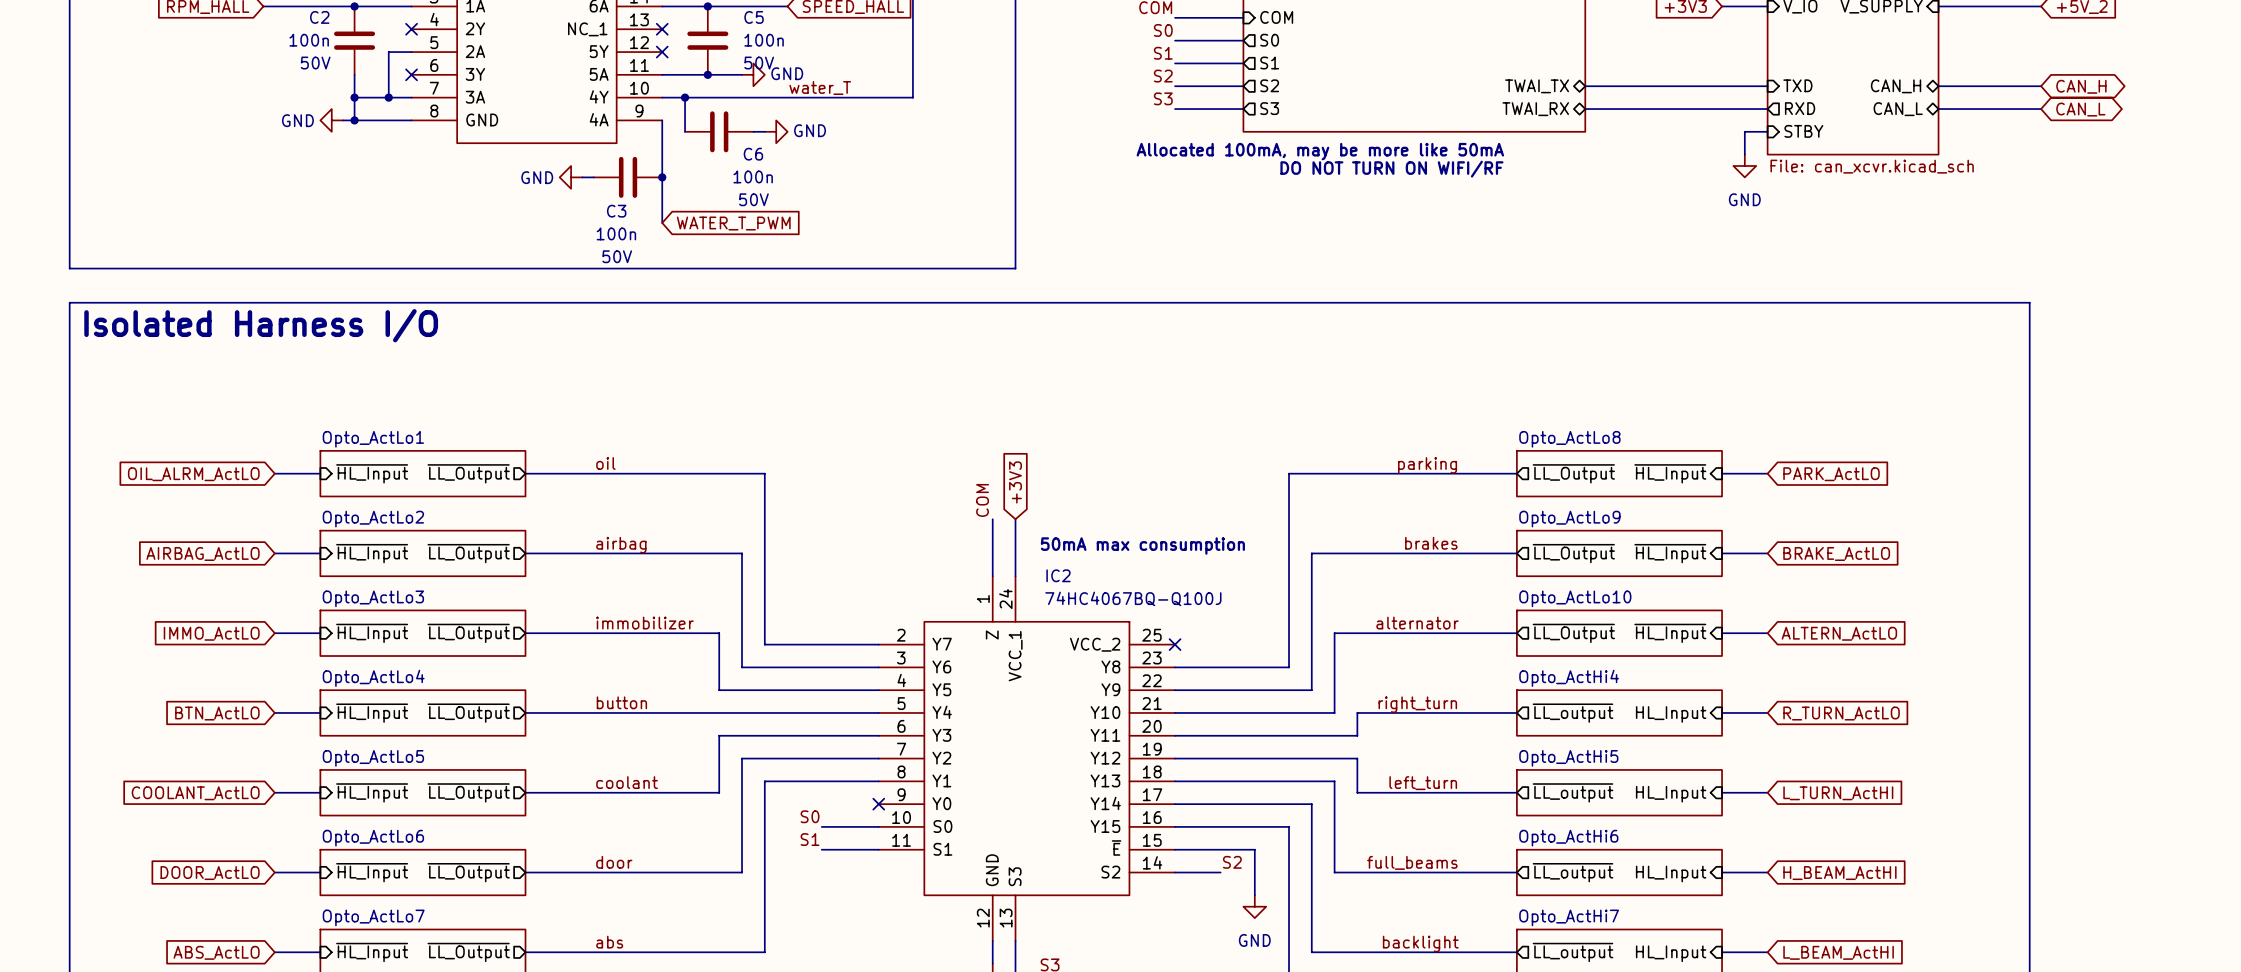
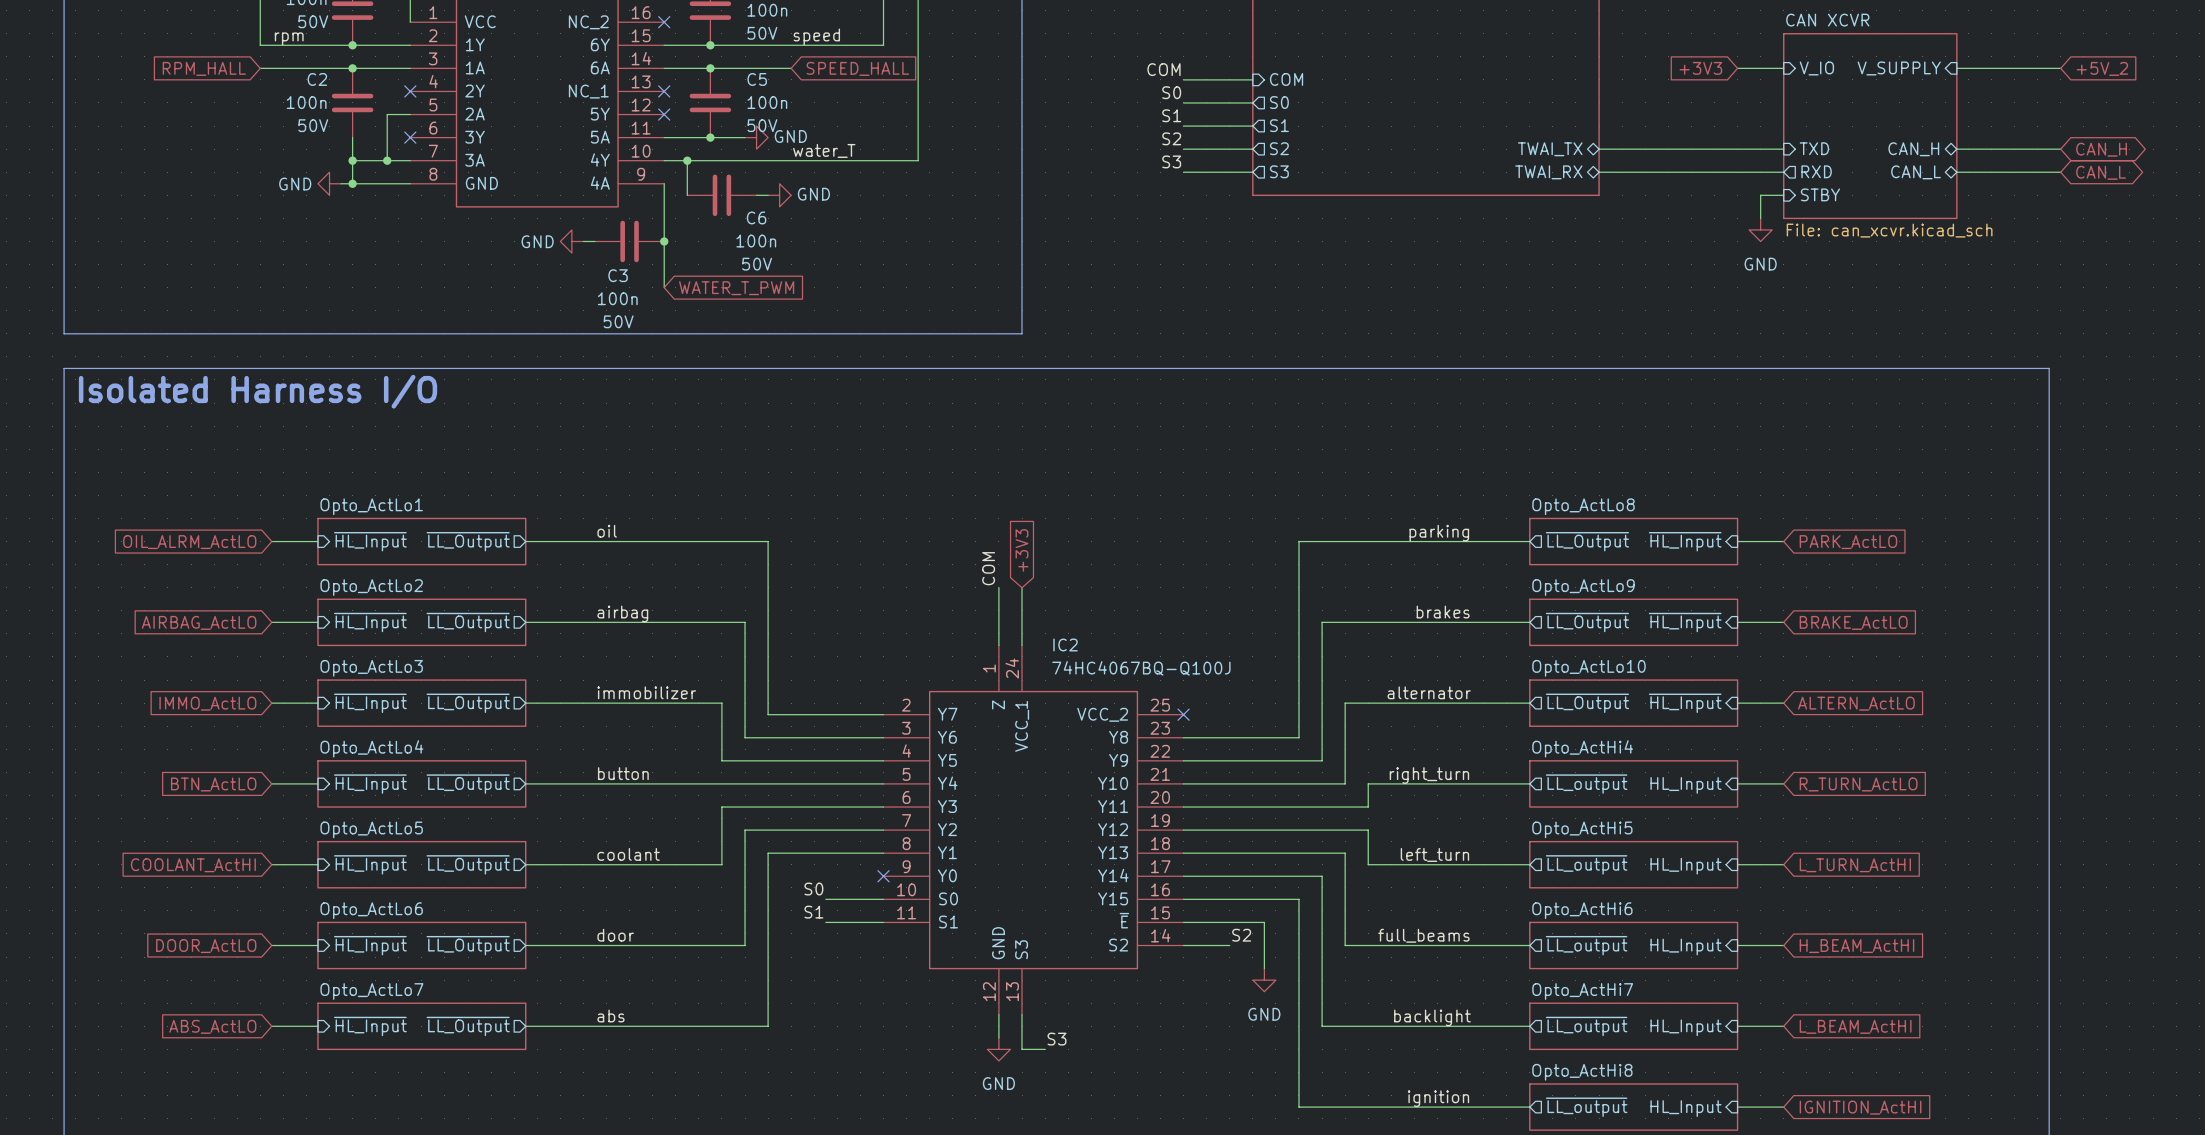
text: Allocated 100mA, may be more like 50mA (1320, 151) -> none
text: DO NOT TURN ON WIFI/RF (1391, 169) -> none
text: 50mA max consumption (1142, 546) -> none
global label: COOLANT_ActLO (195, 793) -> COOLANT_ActHI (193, 865)

